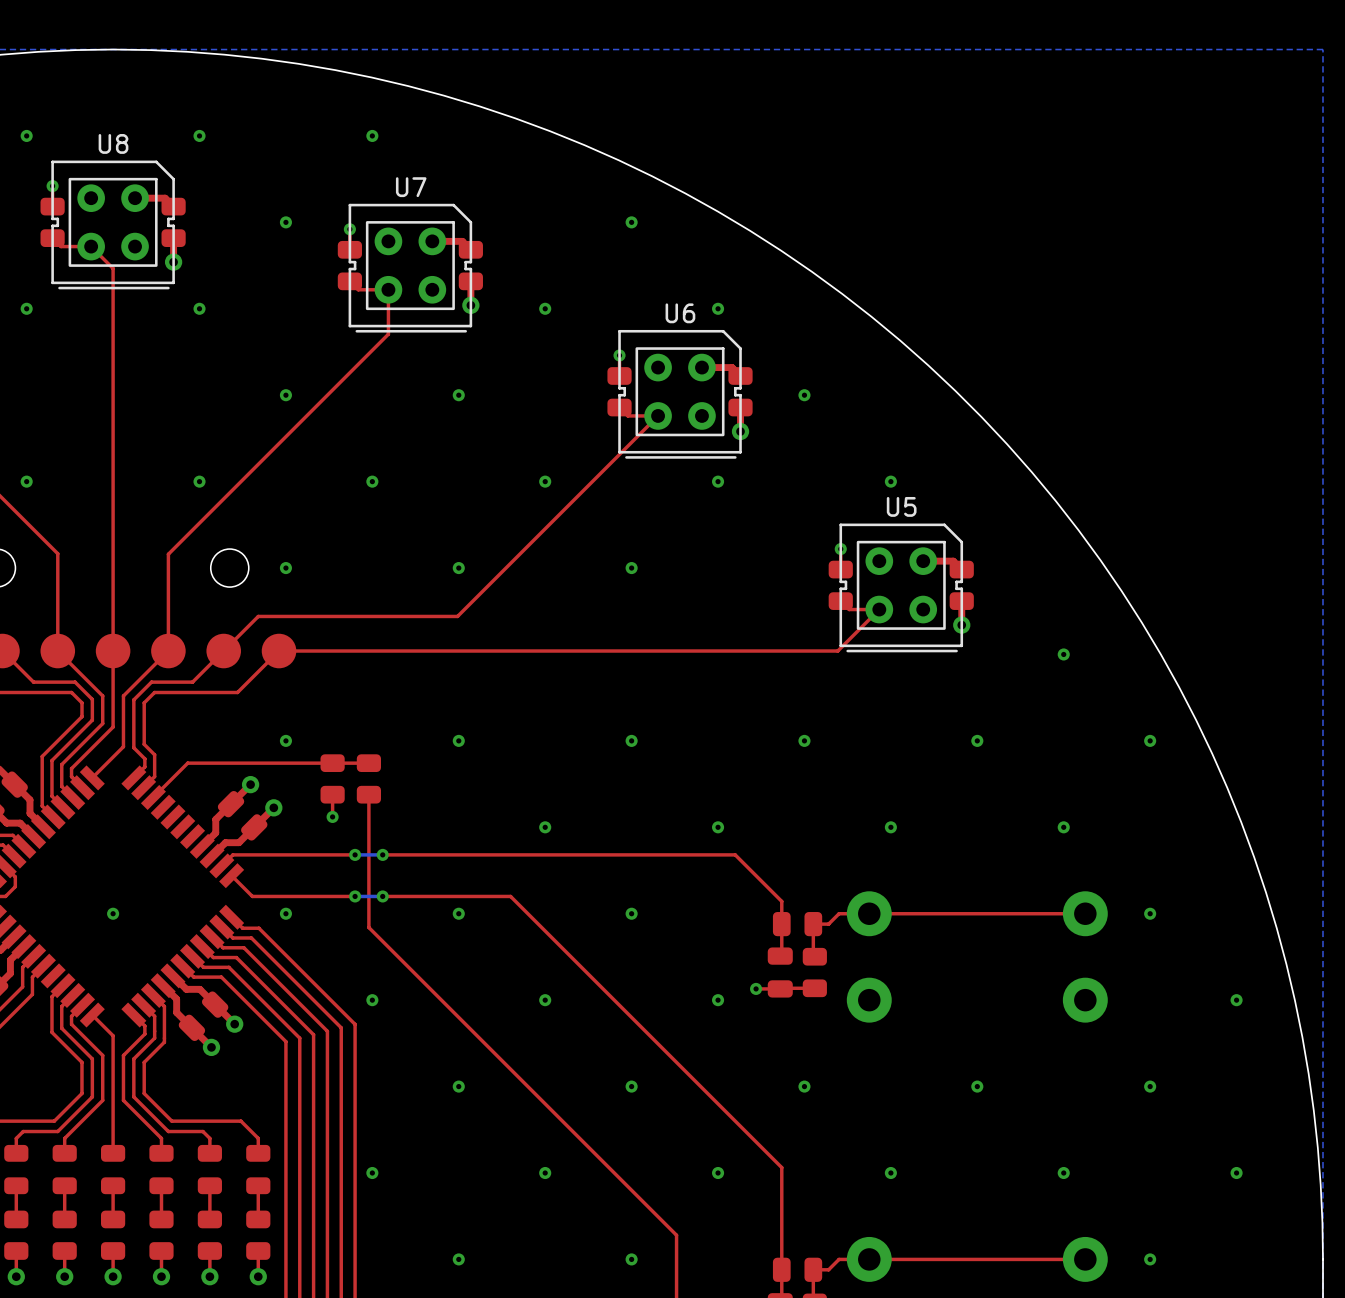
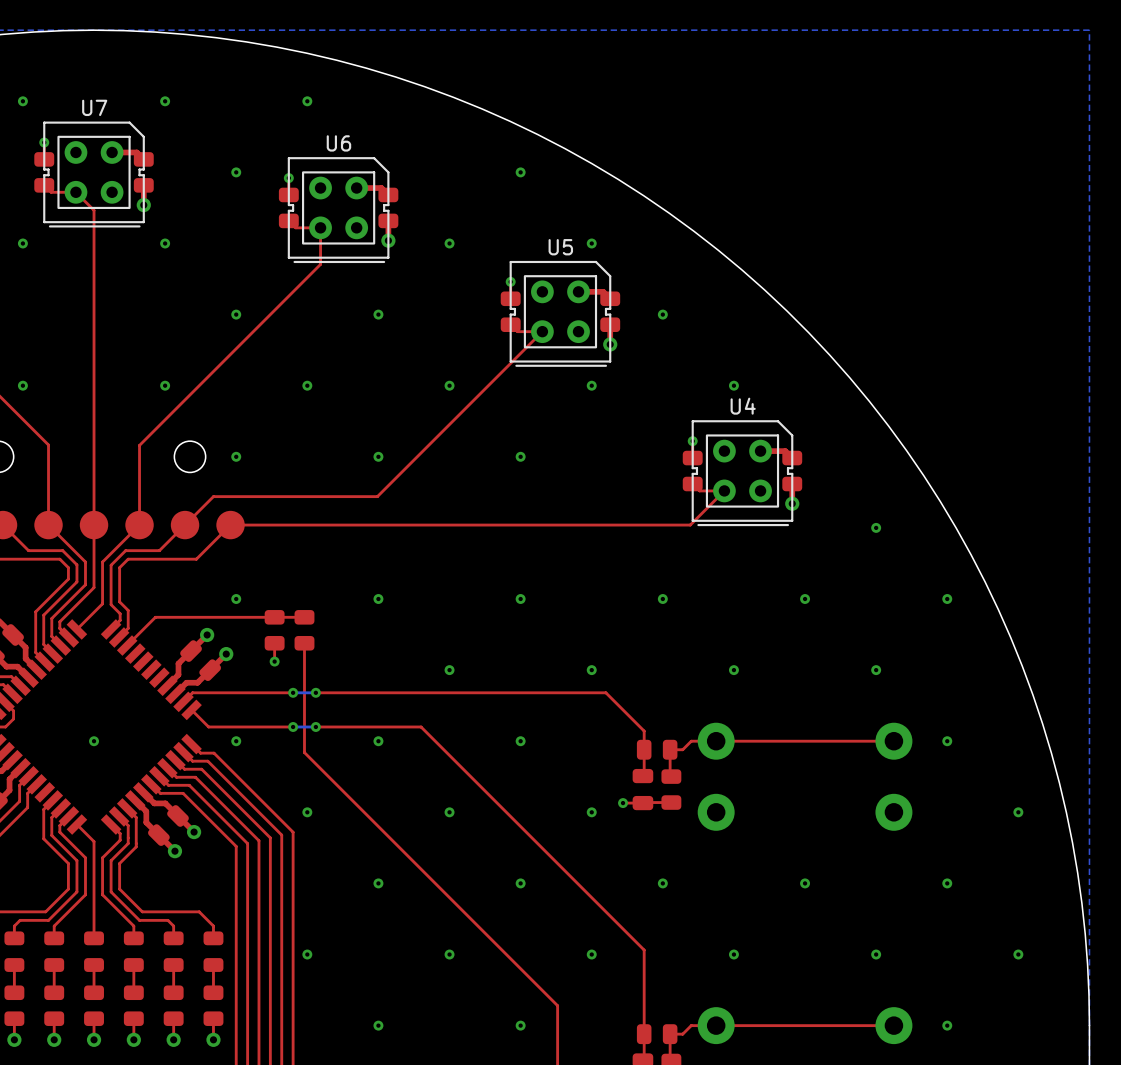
U8 name: U8 (113, 143) -> U7 (94, 107)
U7 name: U7 (411, 187) -> U6 (338, 143)
U6 name: U6 (680, 313) -> U5 (560, 247)
U5 name: U5 (901, 506) -> U4 (743, 406)

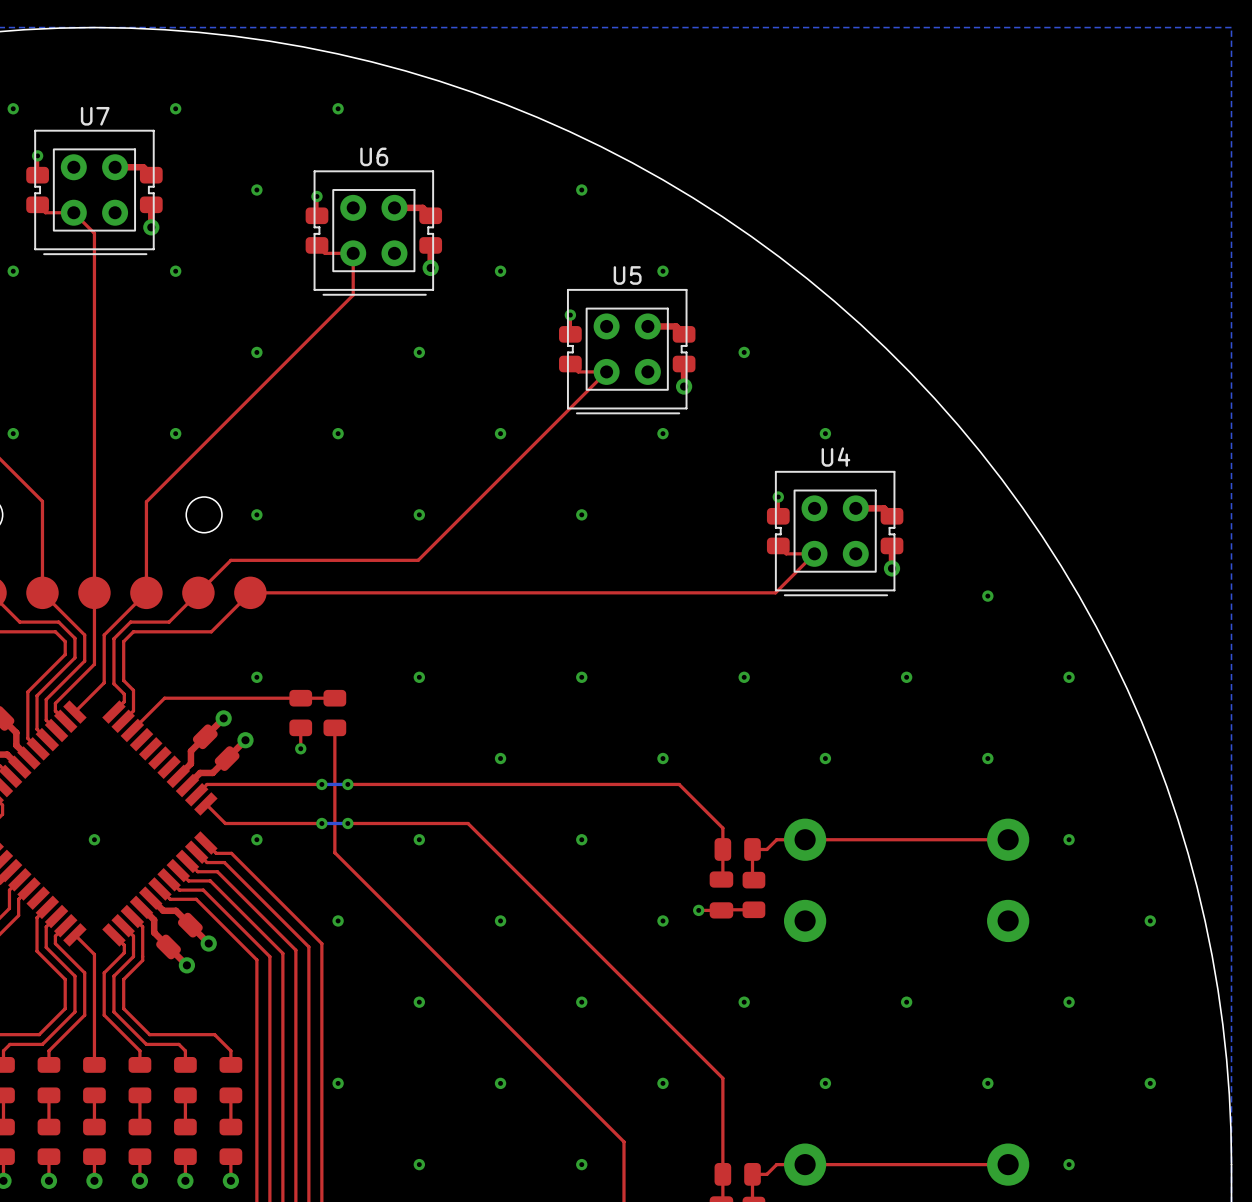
U7 footprint: [43, 121, 145, 228] -> [34, 129, 155, 256]
U6 footprint: [287, 157, 390, 264] -> [313, 170, 435, 296]
U5 footprint: [509, 260, 612, 367] -> [566, 288, 688, 415]
U4 footprint: [691, 420, 794, 527] -> [774, 470, 896, 597]

